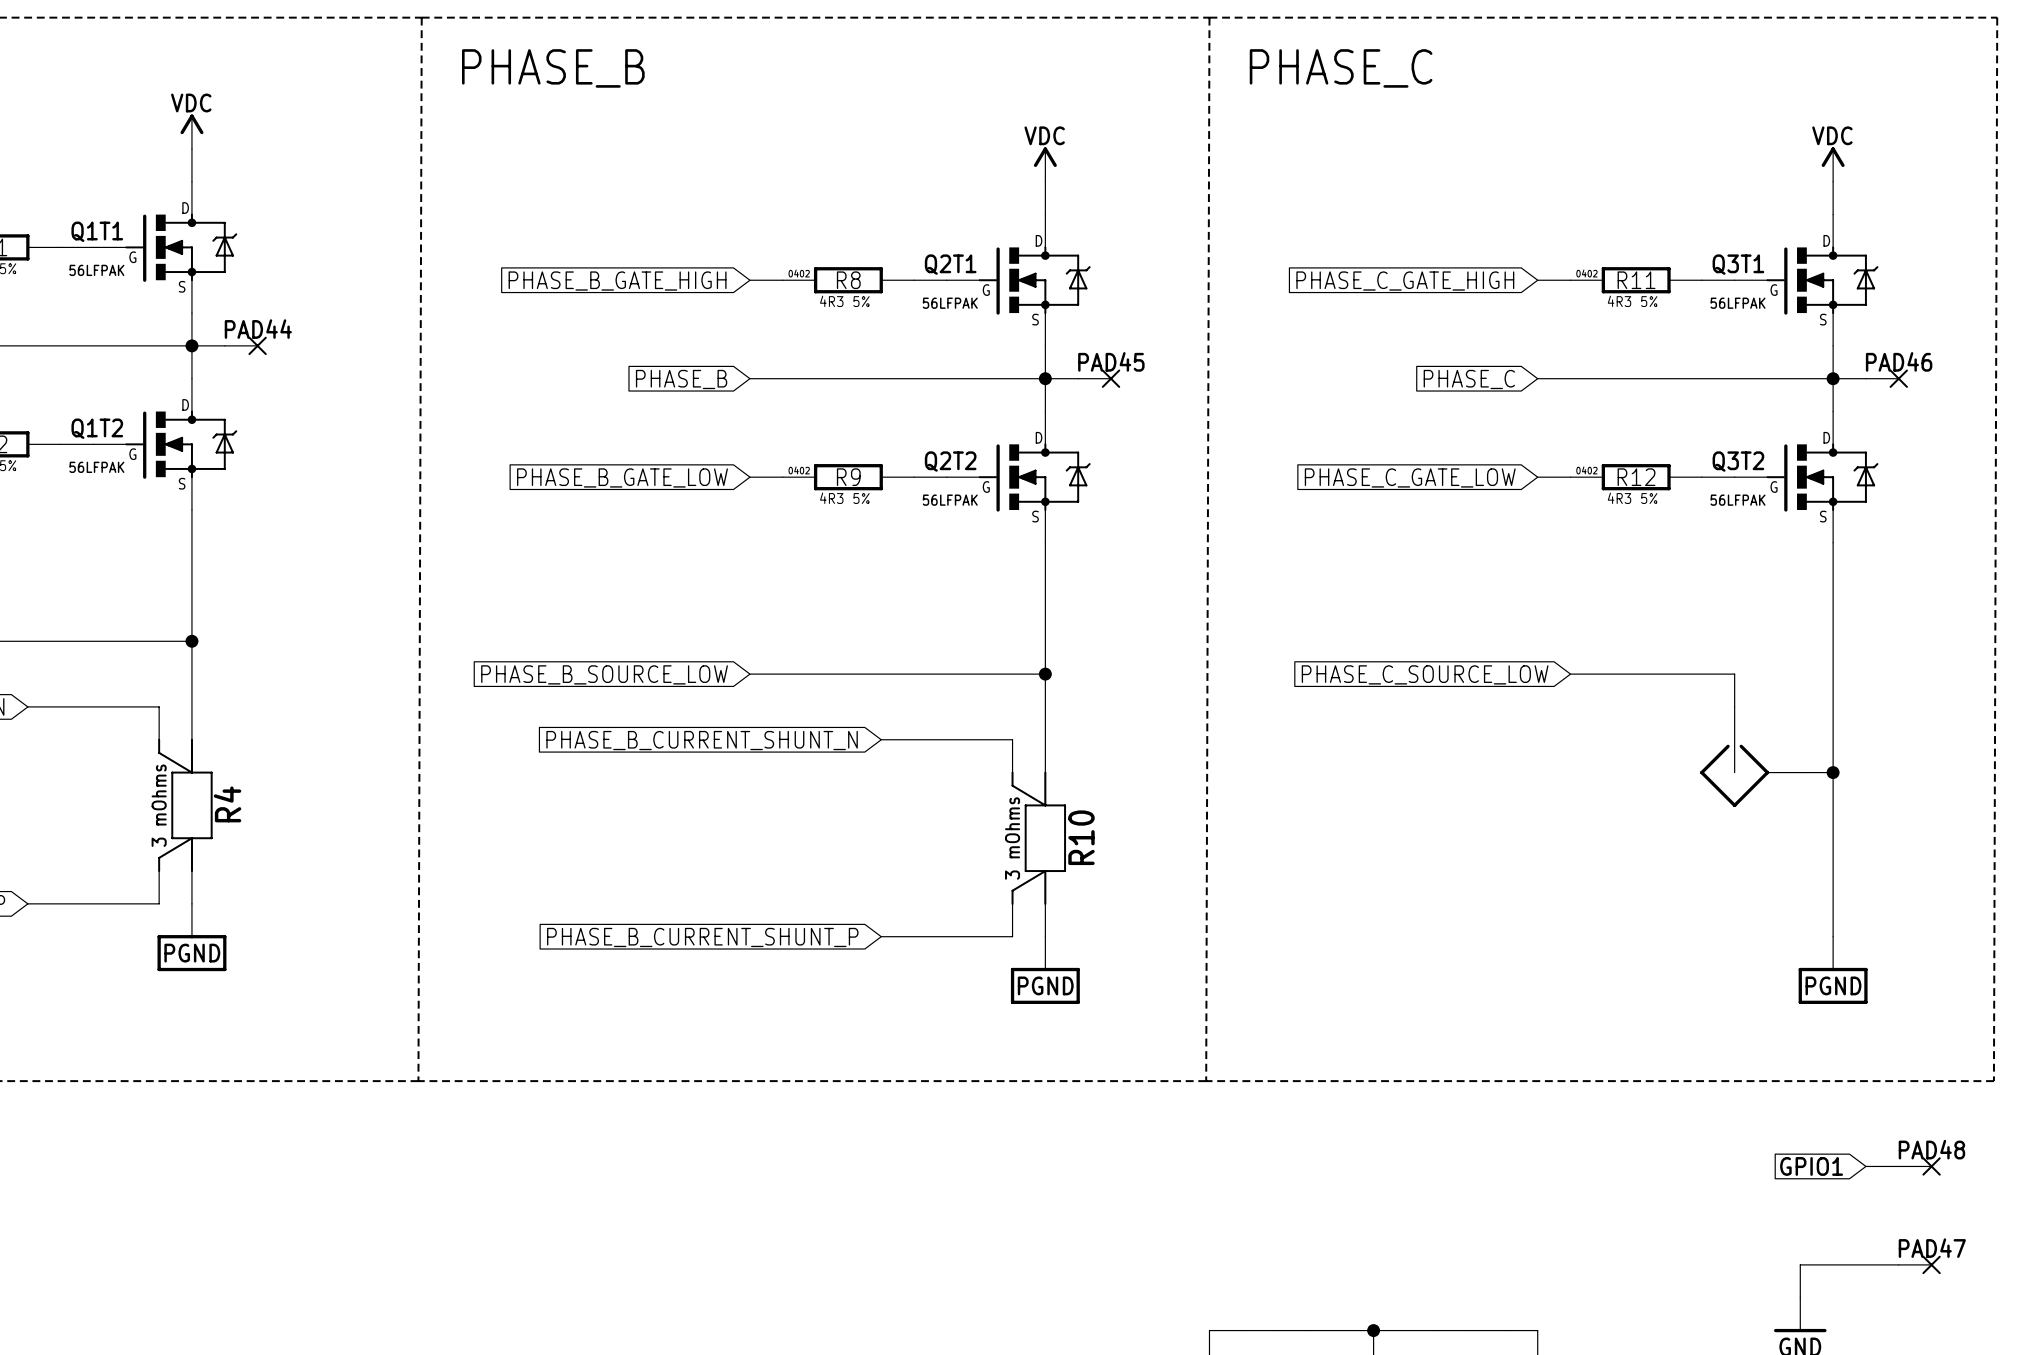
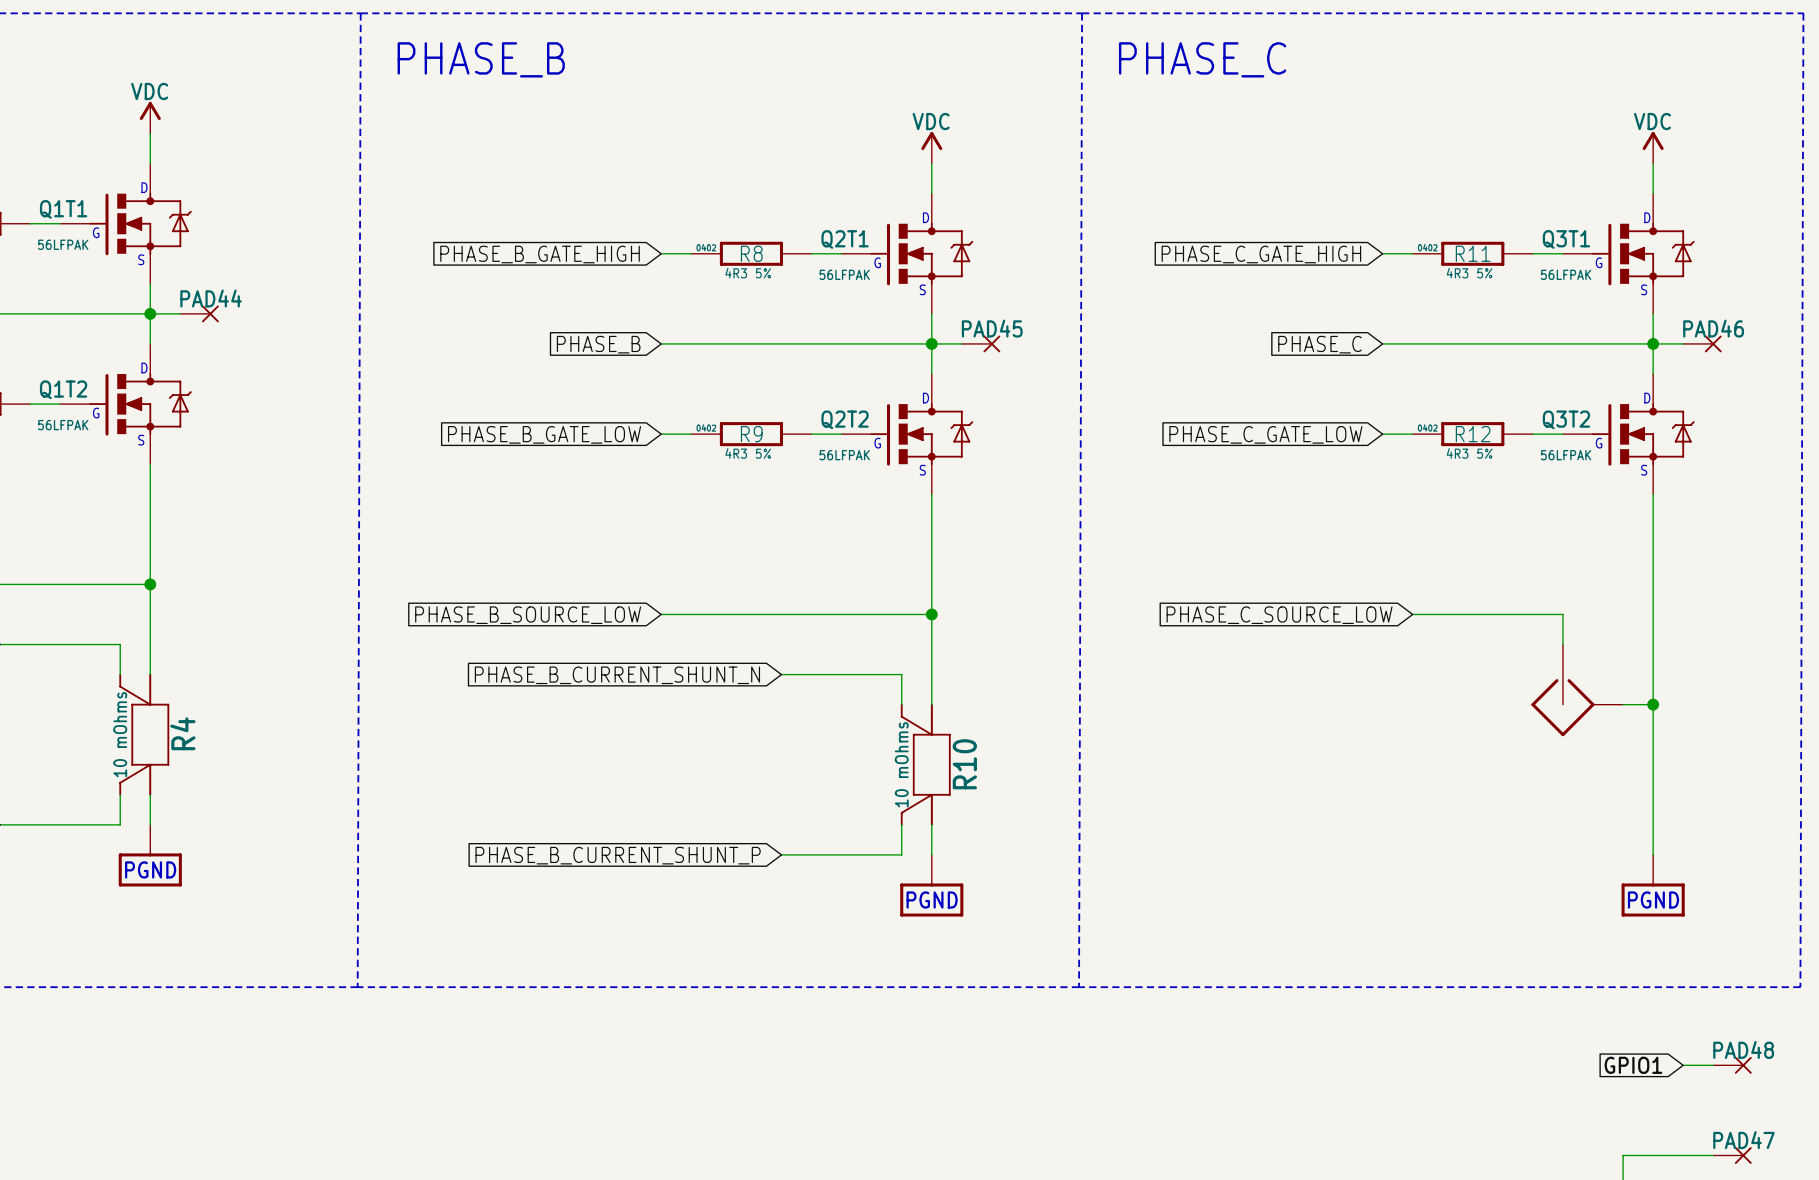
R4 value: 3 mOhms (159, 805) -> 10 mOhms (120, 734)
R10 value: 3 mOhms (1012, 838) -> 10 mOhms (901, 764)

